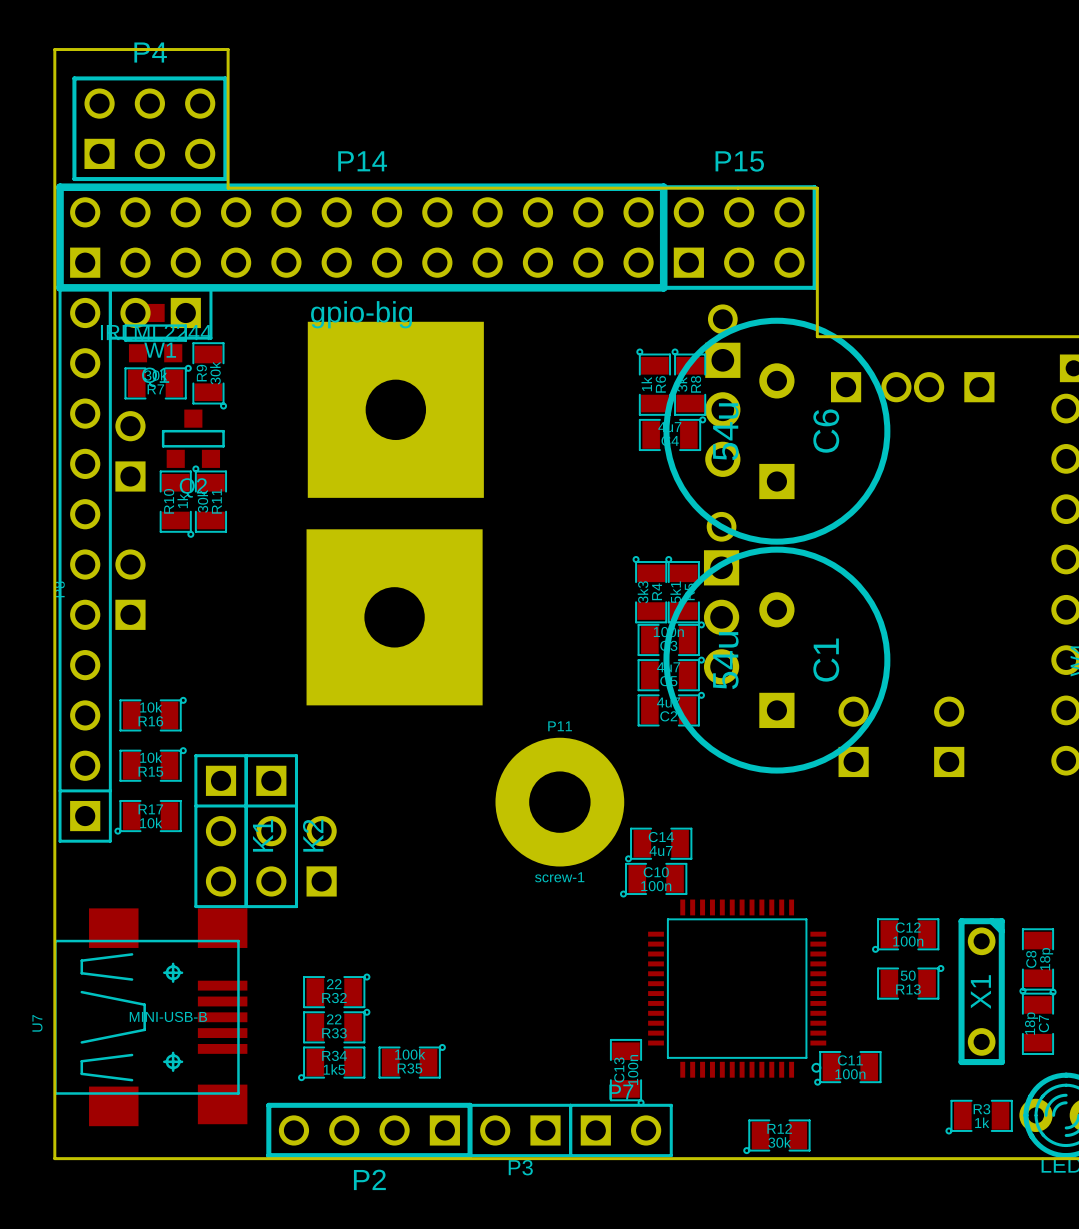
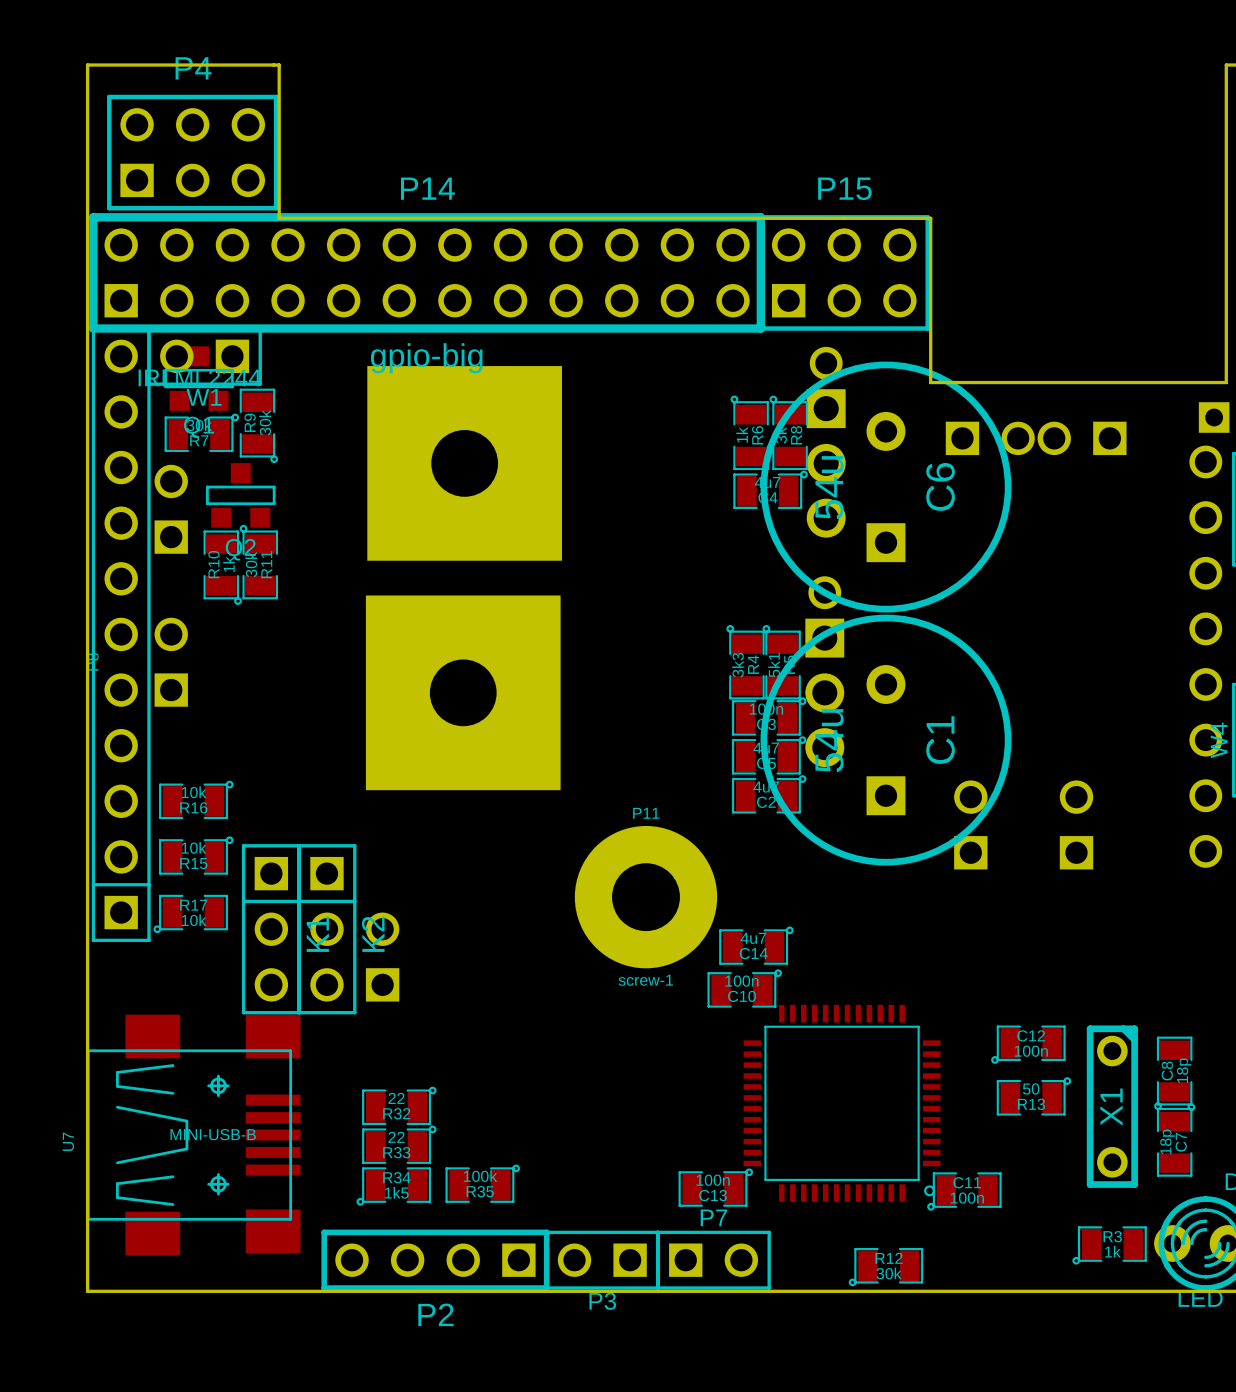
C14 rotation: 0° (658, 844) -> 180° (756, 945)
C10 rotation: 0° (653, 880) -> 180° (744, 988)
C13 rotation: 0° (627, 1072) -> 90° counterclockwise (715, 1187)

